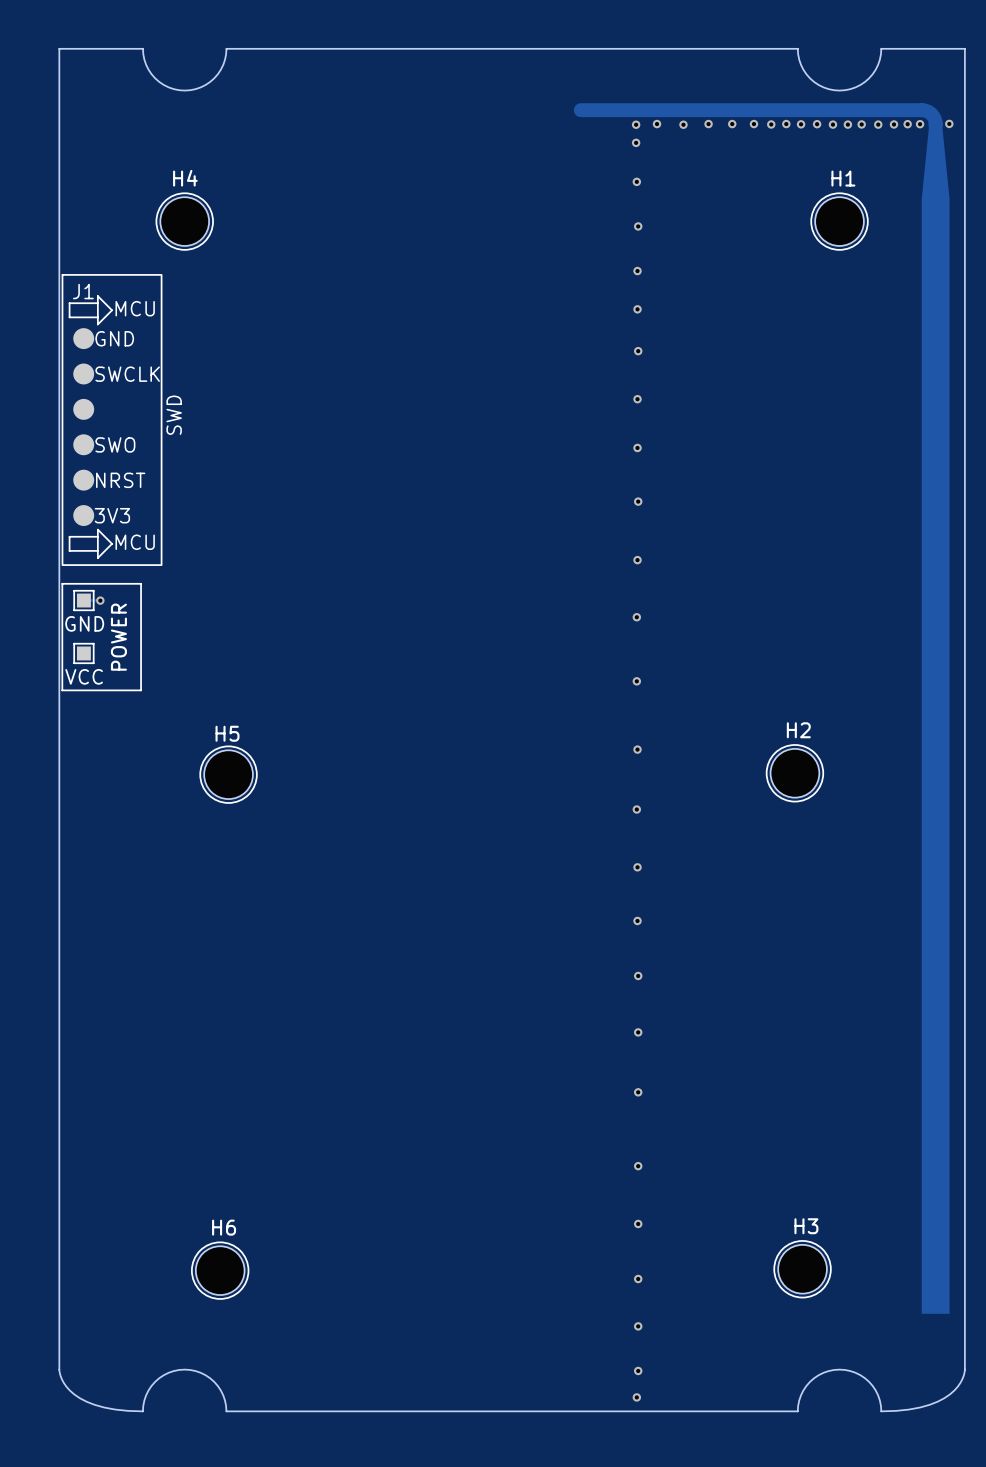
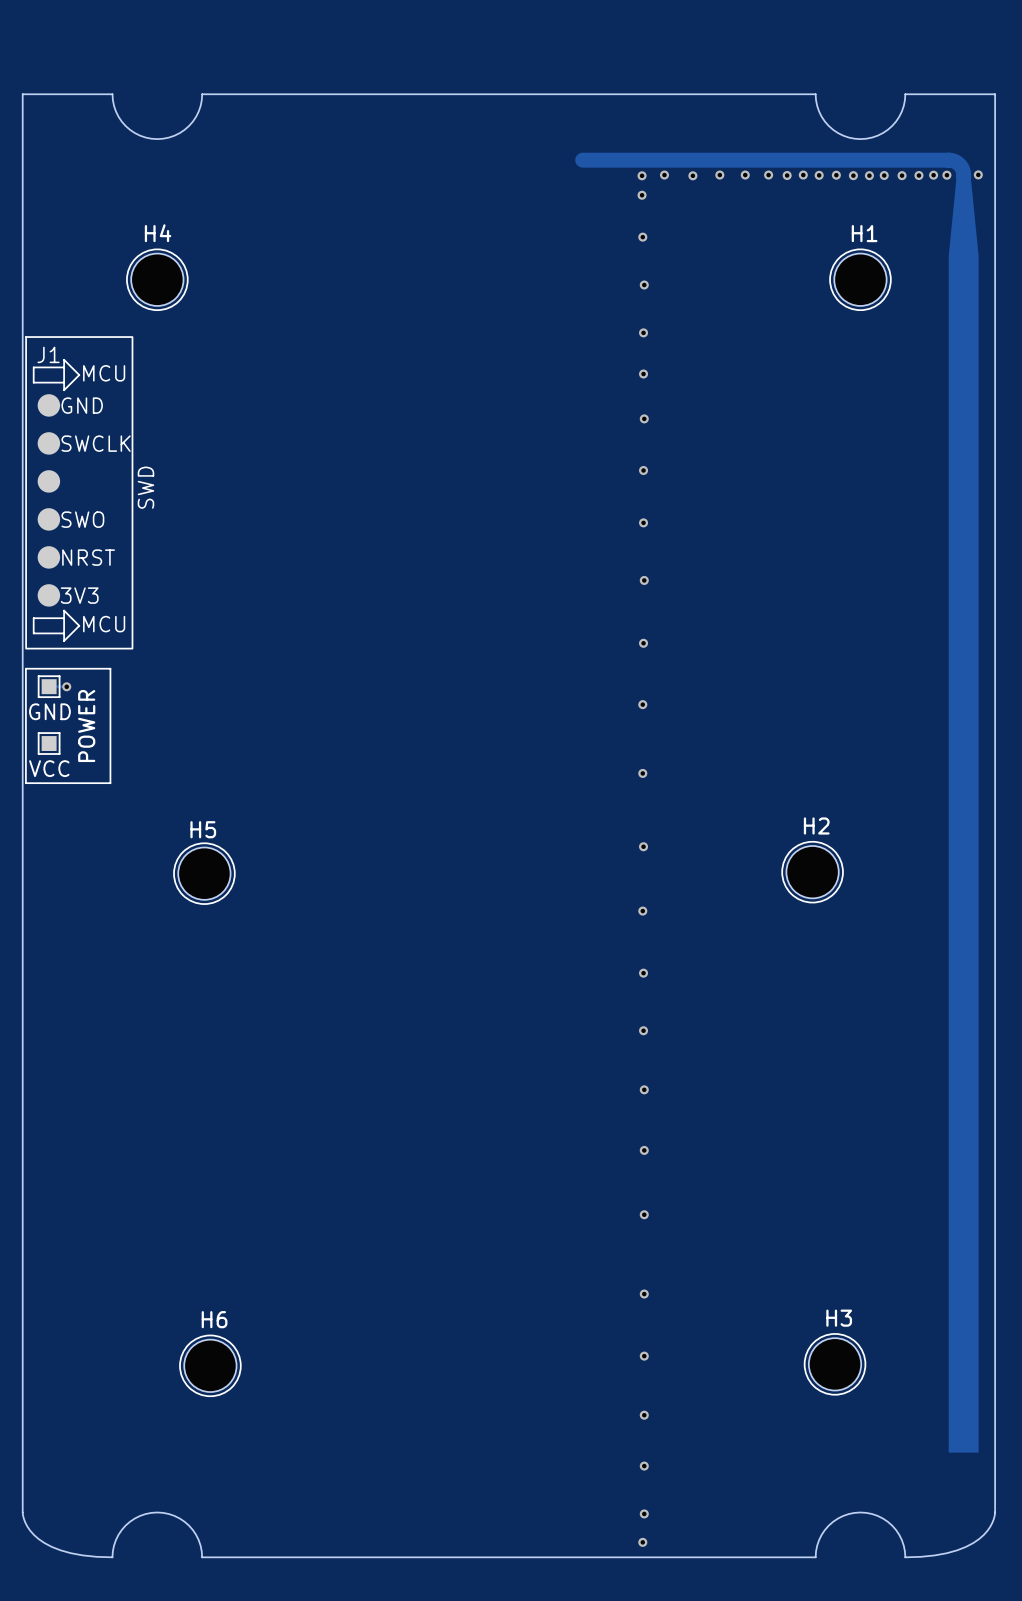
H3 position: (802, 1269) -> (835, 1364)
H6 position: (220, 1270) -> (210, 1365)

